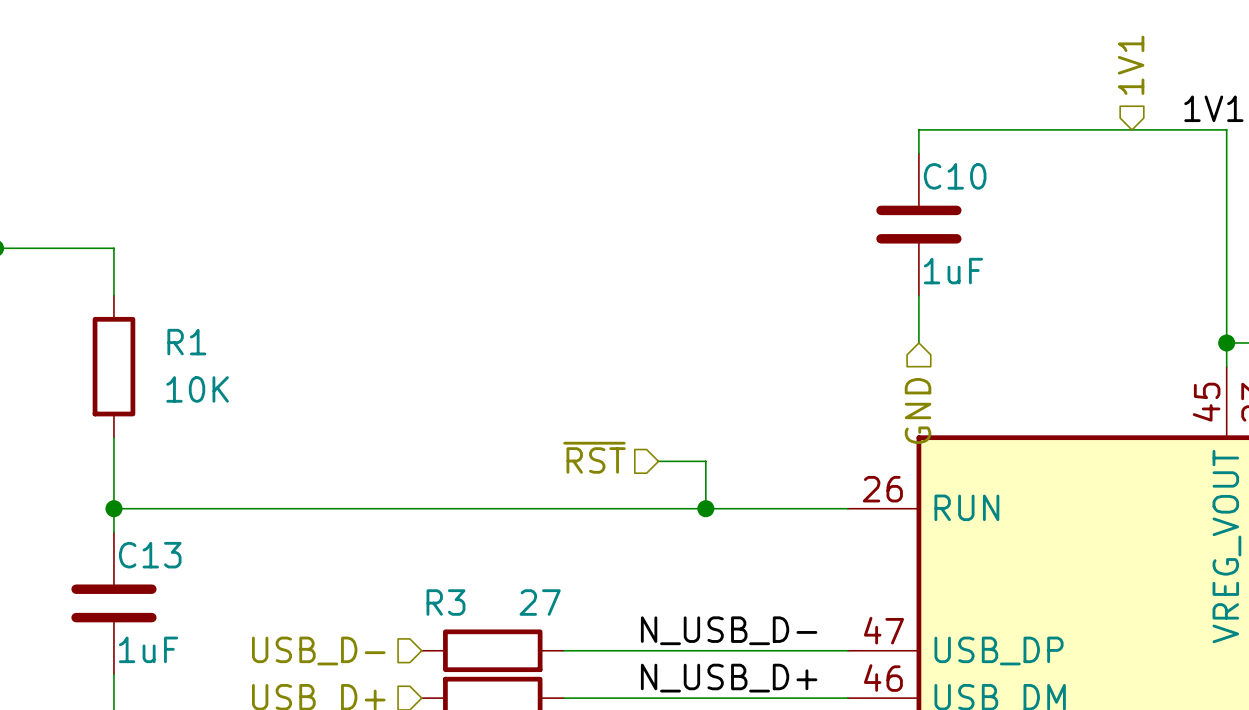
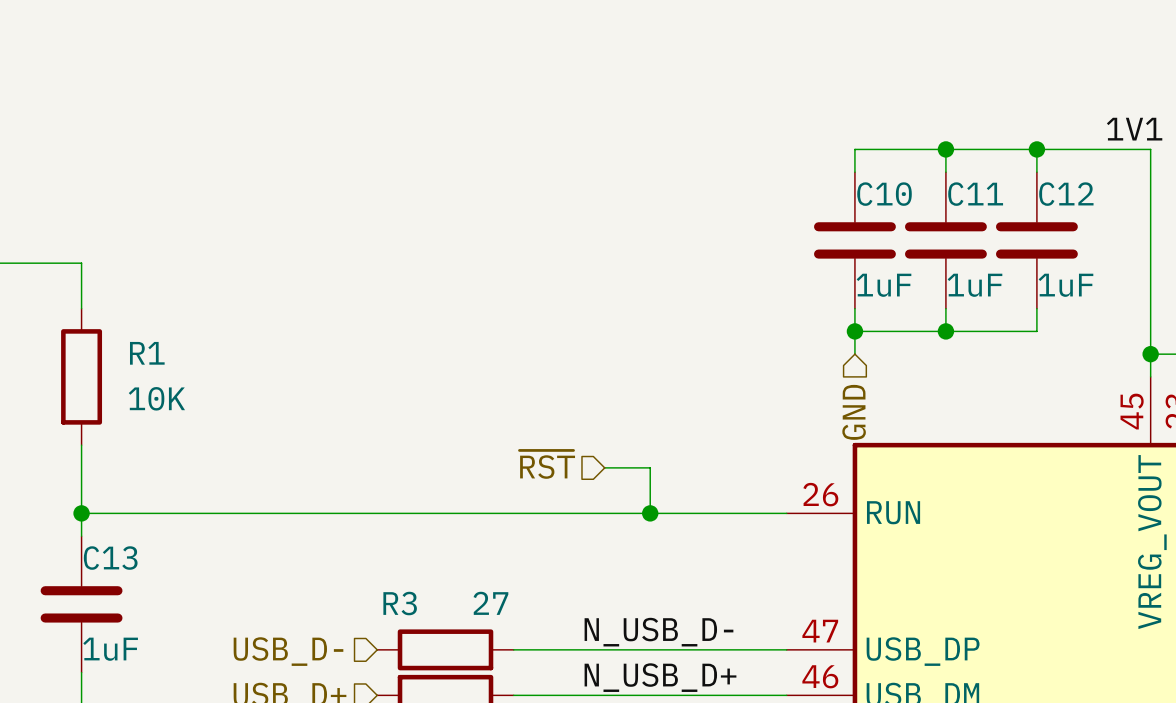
hierarchical label: 1V1 (1131, 65) -> none
wire: none -> (945, 149) (945, 172)
junction: none -> (945, 149)
wire: none -> (1036, 149) (1036, 172)
junction: none -> (1036, 149)
C11: none -> 1uF (945, 240)
C12: none -> 1uF (1036, 240)
wire: none -> (945, 308) (945, 331)
wire: none -> (1036, 308) (1036, 331) (854, 331)
junction: none -> (854, 331)
junction: none -> (945, 331)

